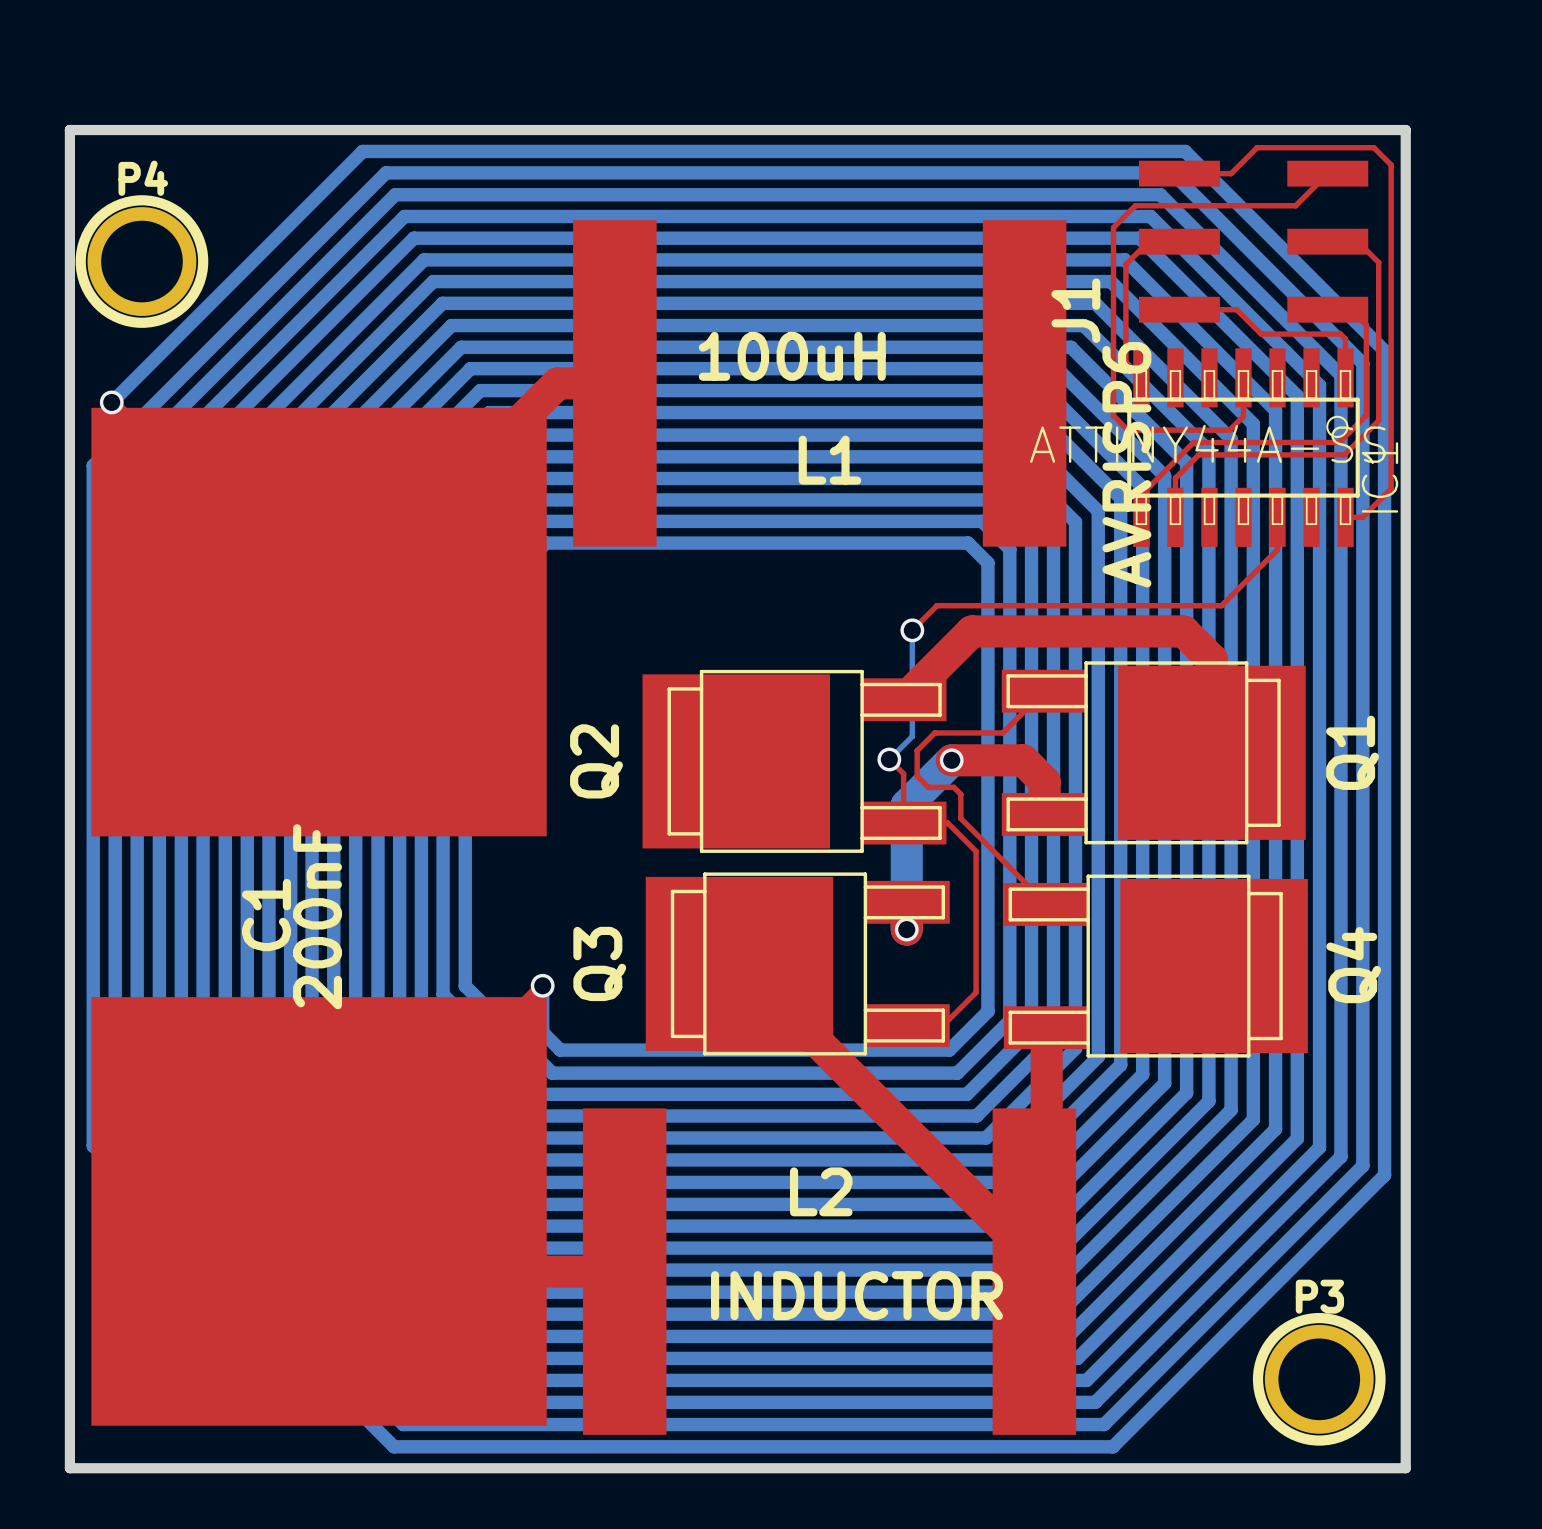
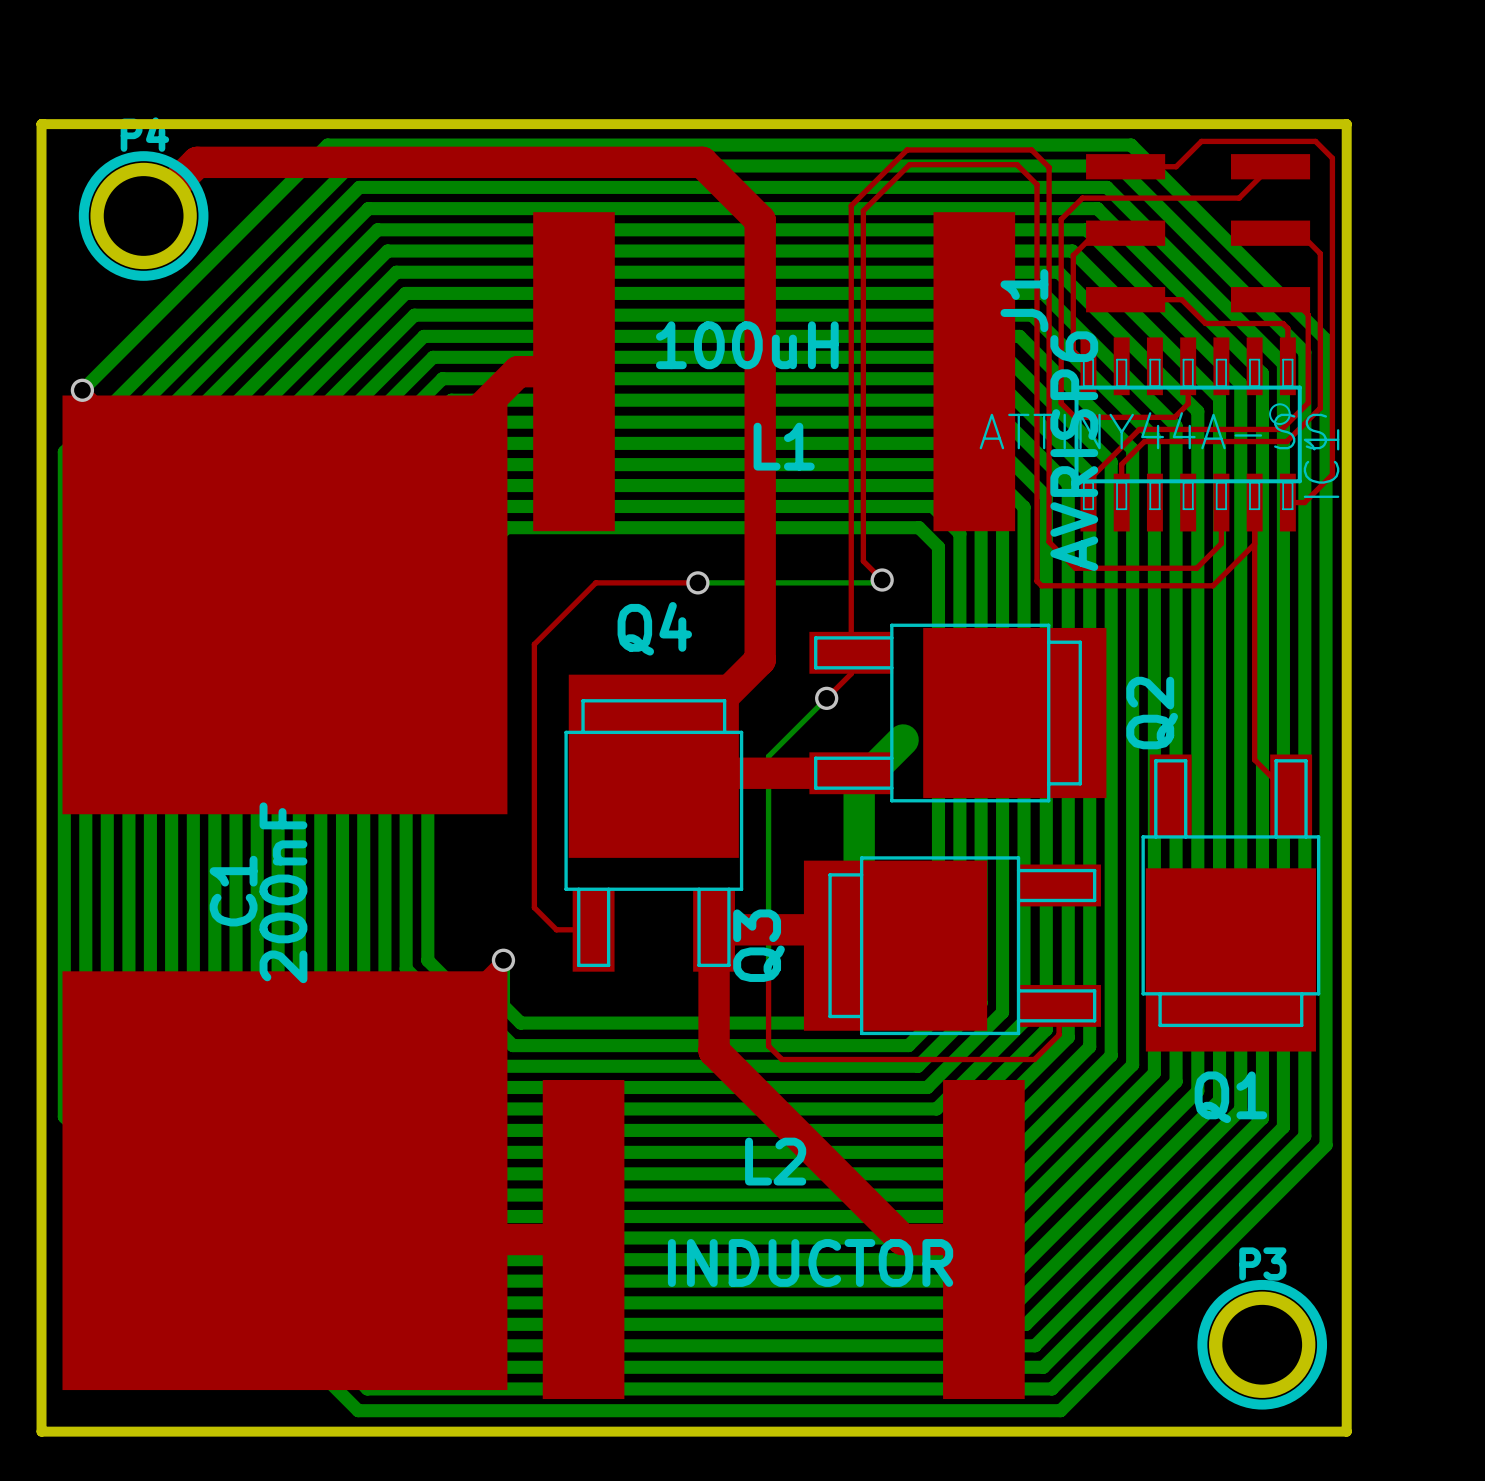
top track: none -> (143, 215) (197, 162) (702, 162) (760, 220) (760, 659) (653, 766) (660, 773) (851, 773)
P4 position: (141, 261) -> (143, 215)
top track: none -> (1254, 502) (1254, 759) (1291, 796)
top track: (1277, 549) (1221, 605) (936, 605) (912, 630) -> (1221, 534) (1221, 543) (1196, 568) (1075, 568) (1049, 541) (1049, 167) (1031, 149) (907, 149) (851, 205) (851, 673) (826, 698)
top track: none -> (1254, 544) (1212, 585) (1041, 585) (1037, 581) (1037, 184) (1016, 164) (909, 164) (863, 210) (863, 561) (882, 580)
bottom track: none -> (882, 580) (879, 582) (697, 582)
top track: none -> (697, 582) (595, 582) (534, 644) (534, 907) (556, 929) (593, 929)
via: none -> (697, 582)
bottom track: (912, 630) (912, 736) (889, 759) -> none
via position: (912, 630) -> (882, 580)
top track: (1044, 691) (1002, 732) (934, 732) (917, 750) (917, 776) (928, 787) (953, 787) (960, 794) (960, 818) (1046, 904) -> none
top track: (903, 699) (971, 631) (1183, 631) (1211, 659) (1211, 752) -> none
bottom track: none -> (826, 698) (768, 756) (768, 978)
via: none -> (826, 698)
Q1 rotation: 0° (1153, 752) -> 90° clockwise (1230, 903)
Q1 position: (1153, 752) -> (1230, 903)
top track: (889, 759) (903, 773) (903, 823) (947, 823) (976, 851) (976, 992) (943, 1025) (906, 1025) -> none
via: (889, 759) -> none
top track: (951, 760) (1023, 760) (1044, 781) (1044, 814) -> none
via: (951, 760) -> none
Q2 rotation: 0° (794, 761) -> 180° (957, 713)
Q2 position: (794, 761) -> (957, 713)
via: (906, 929) -> none
top track: (739, 963) (1034, 1258) (1034, 1271) (1046, 1259) (1046, 1027) -> none
Q3 position: (797, 963) -> (952, 945)
Q4 rotation: 0° (1155, 966) -> 90° counterclockwise (653, 823)
Q4 position: (1155, 966) -> (653, 823)
top track: none -> (895, 945) (879, 929) (714, 929) (714, 1050) (902, 1239) (983, 1239)
top track: none -> (768, 978) (768, 1046) (782, 1059) (1034, 1059) (1059, 1034) (1059, 1005)

